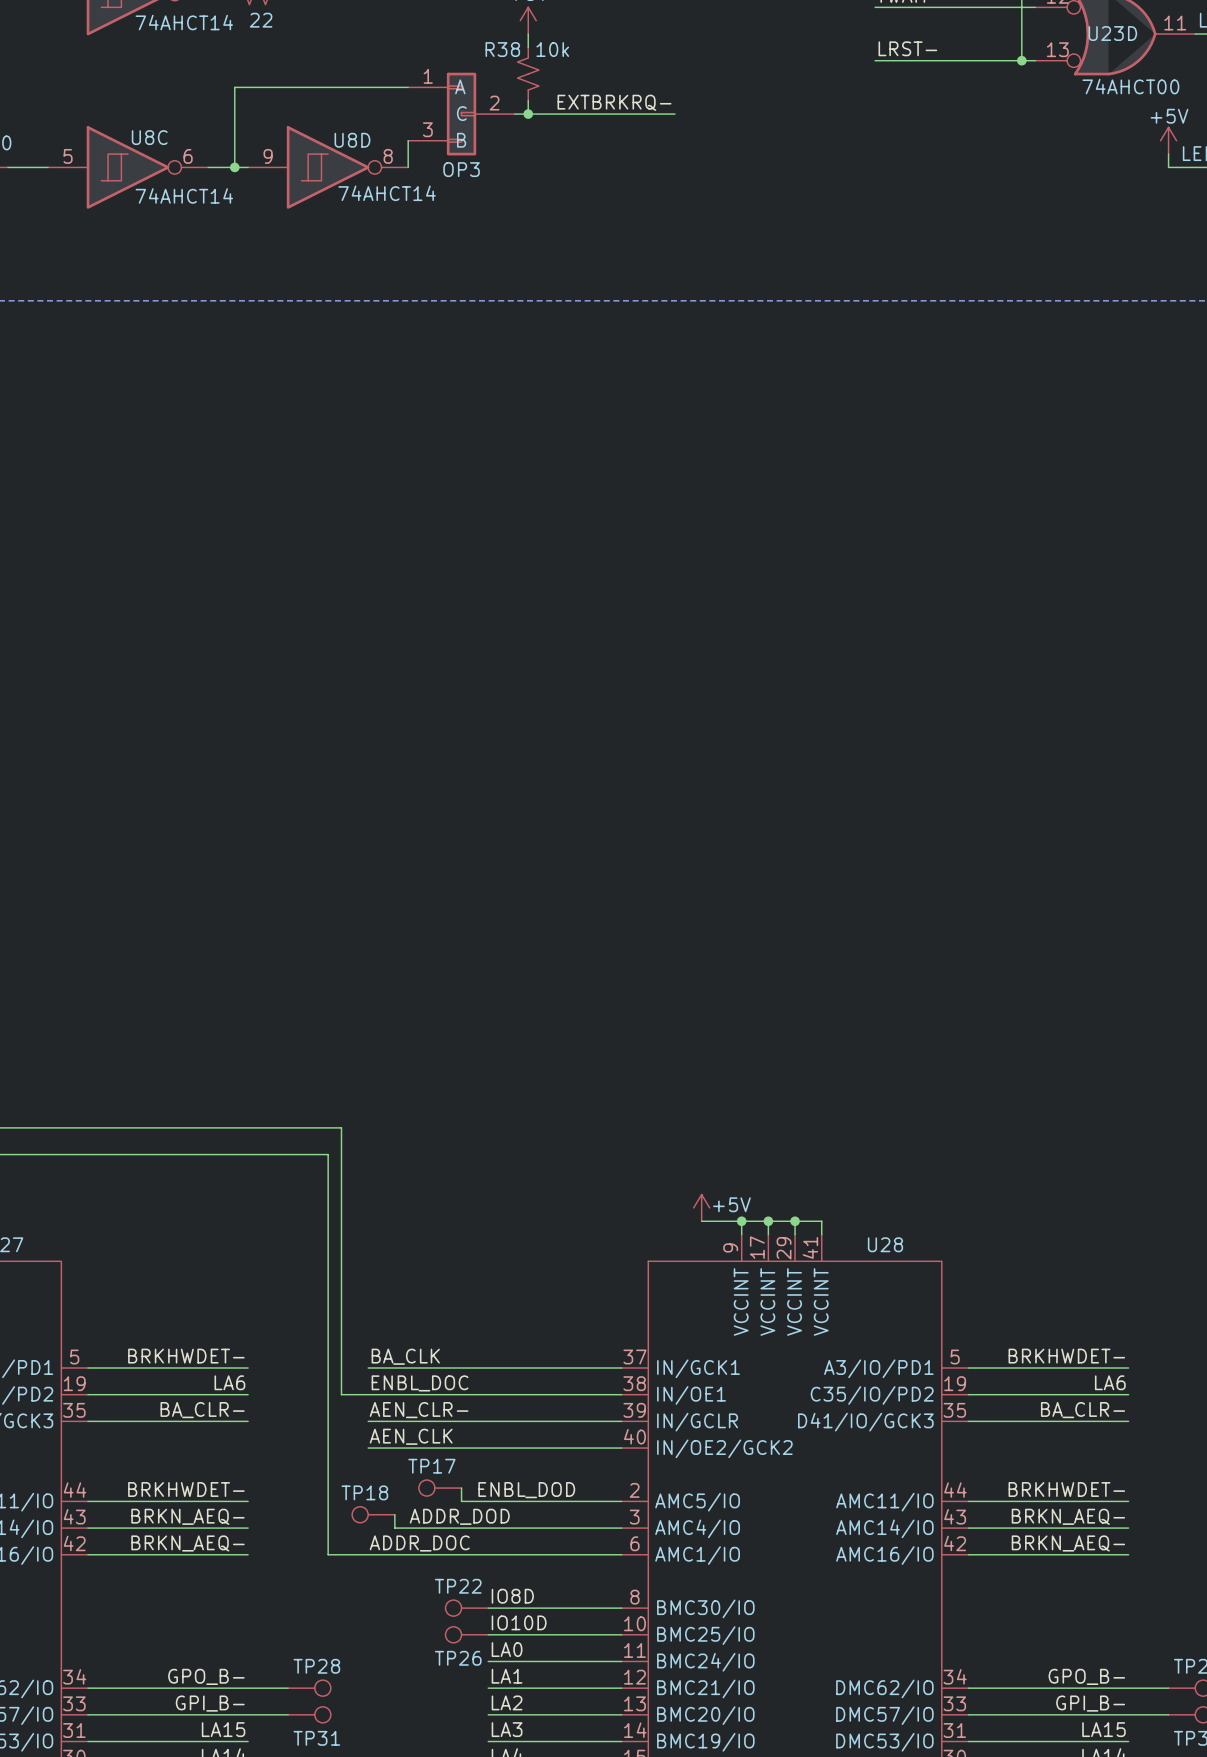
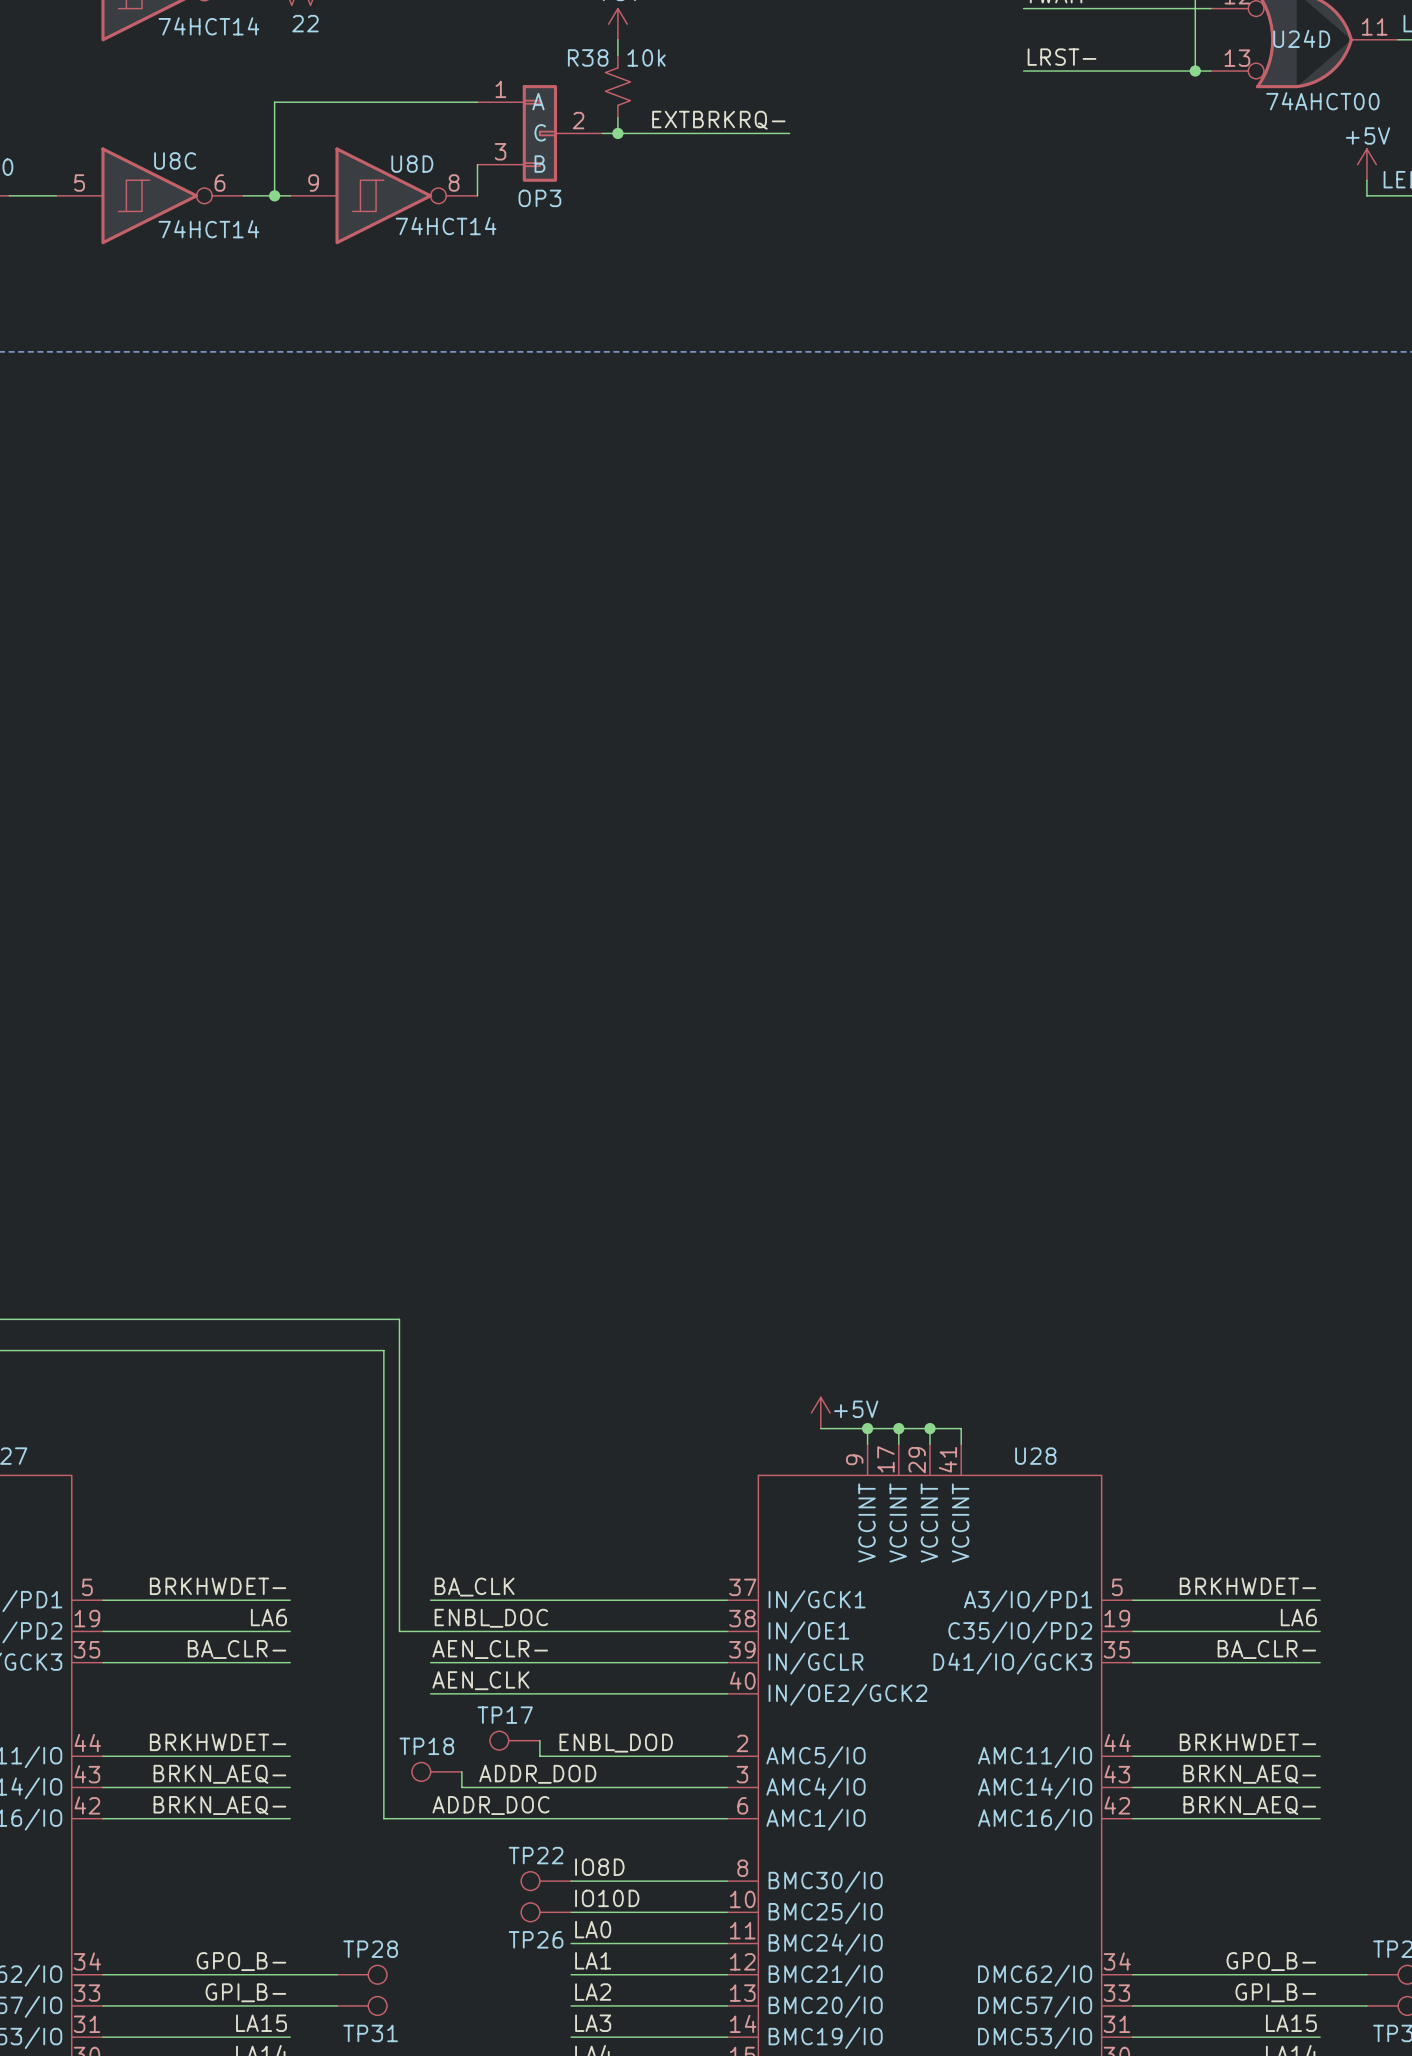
part value: 74AHCT14 (184, 22) -> 74HCT14 (208, 26)
U23D name: U23D (1112, 33) -> U24D (1301, 38)
U8D value: 74AHCT14 (387, 193) -> 74HCT14 (446, 226)
U8C value: 74AHCT14 (184, 195) -> 74HCT14 (208, 229)

